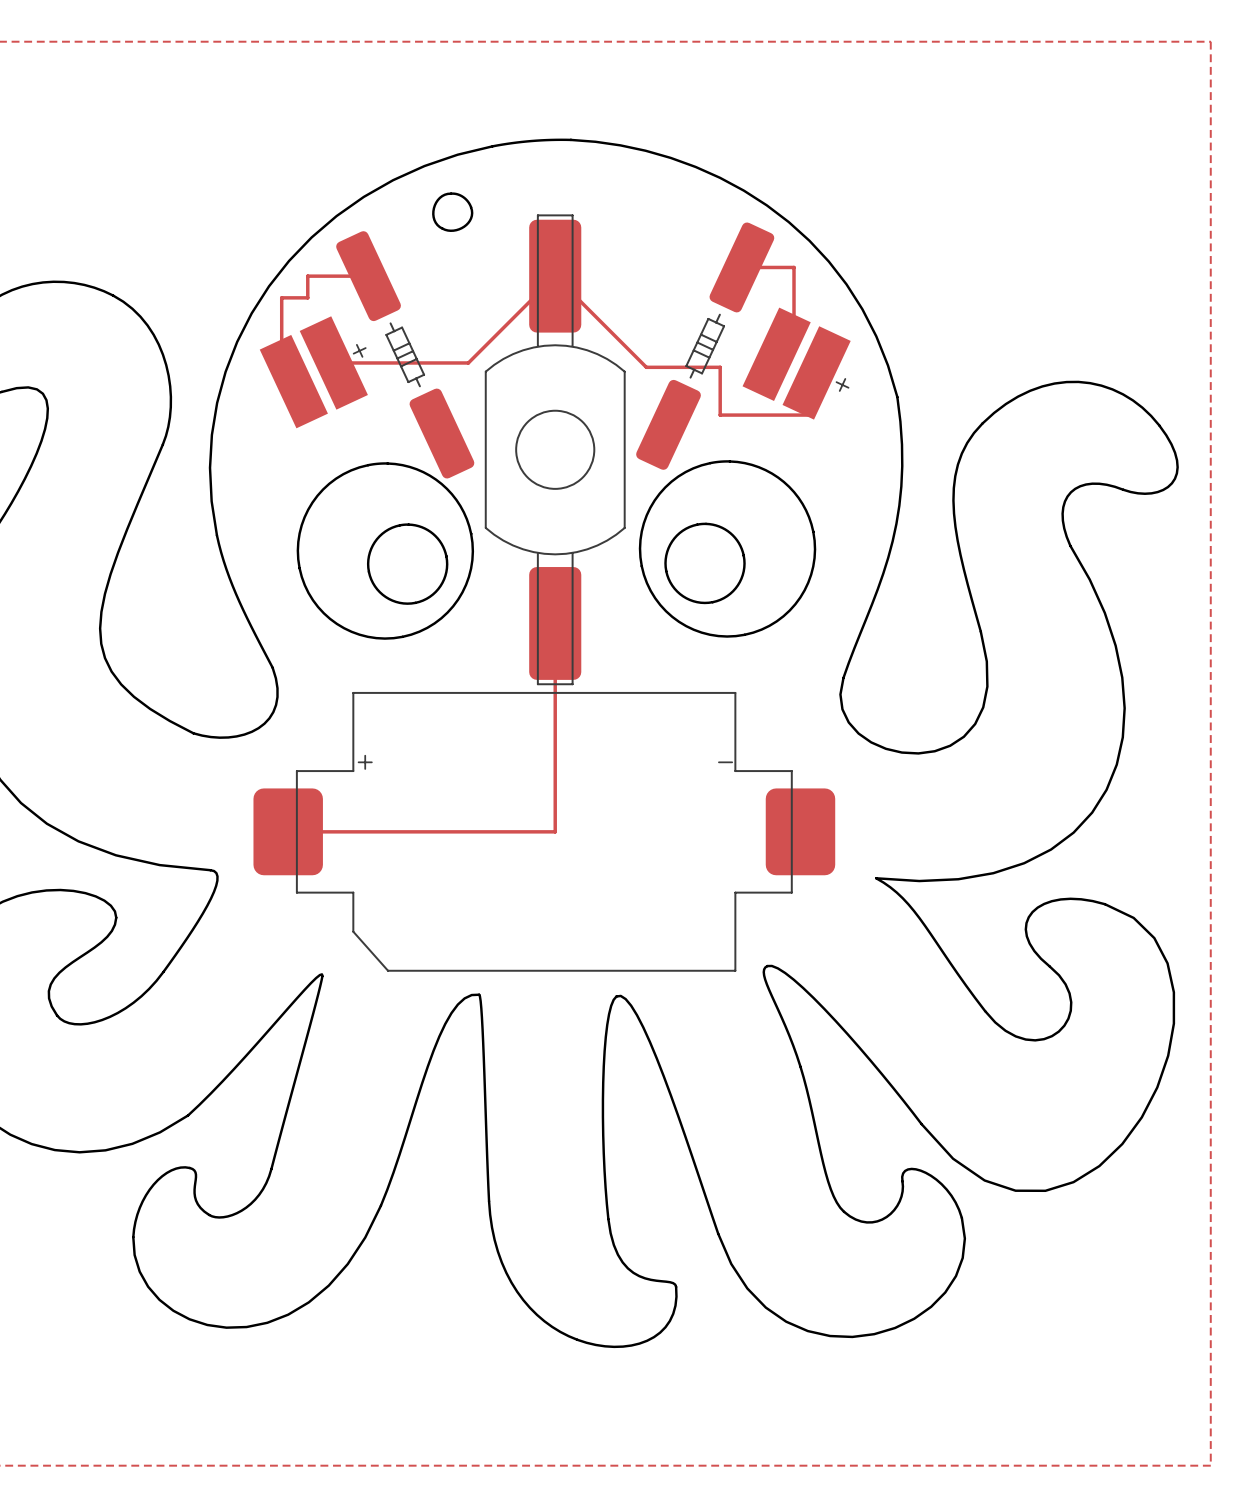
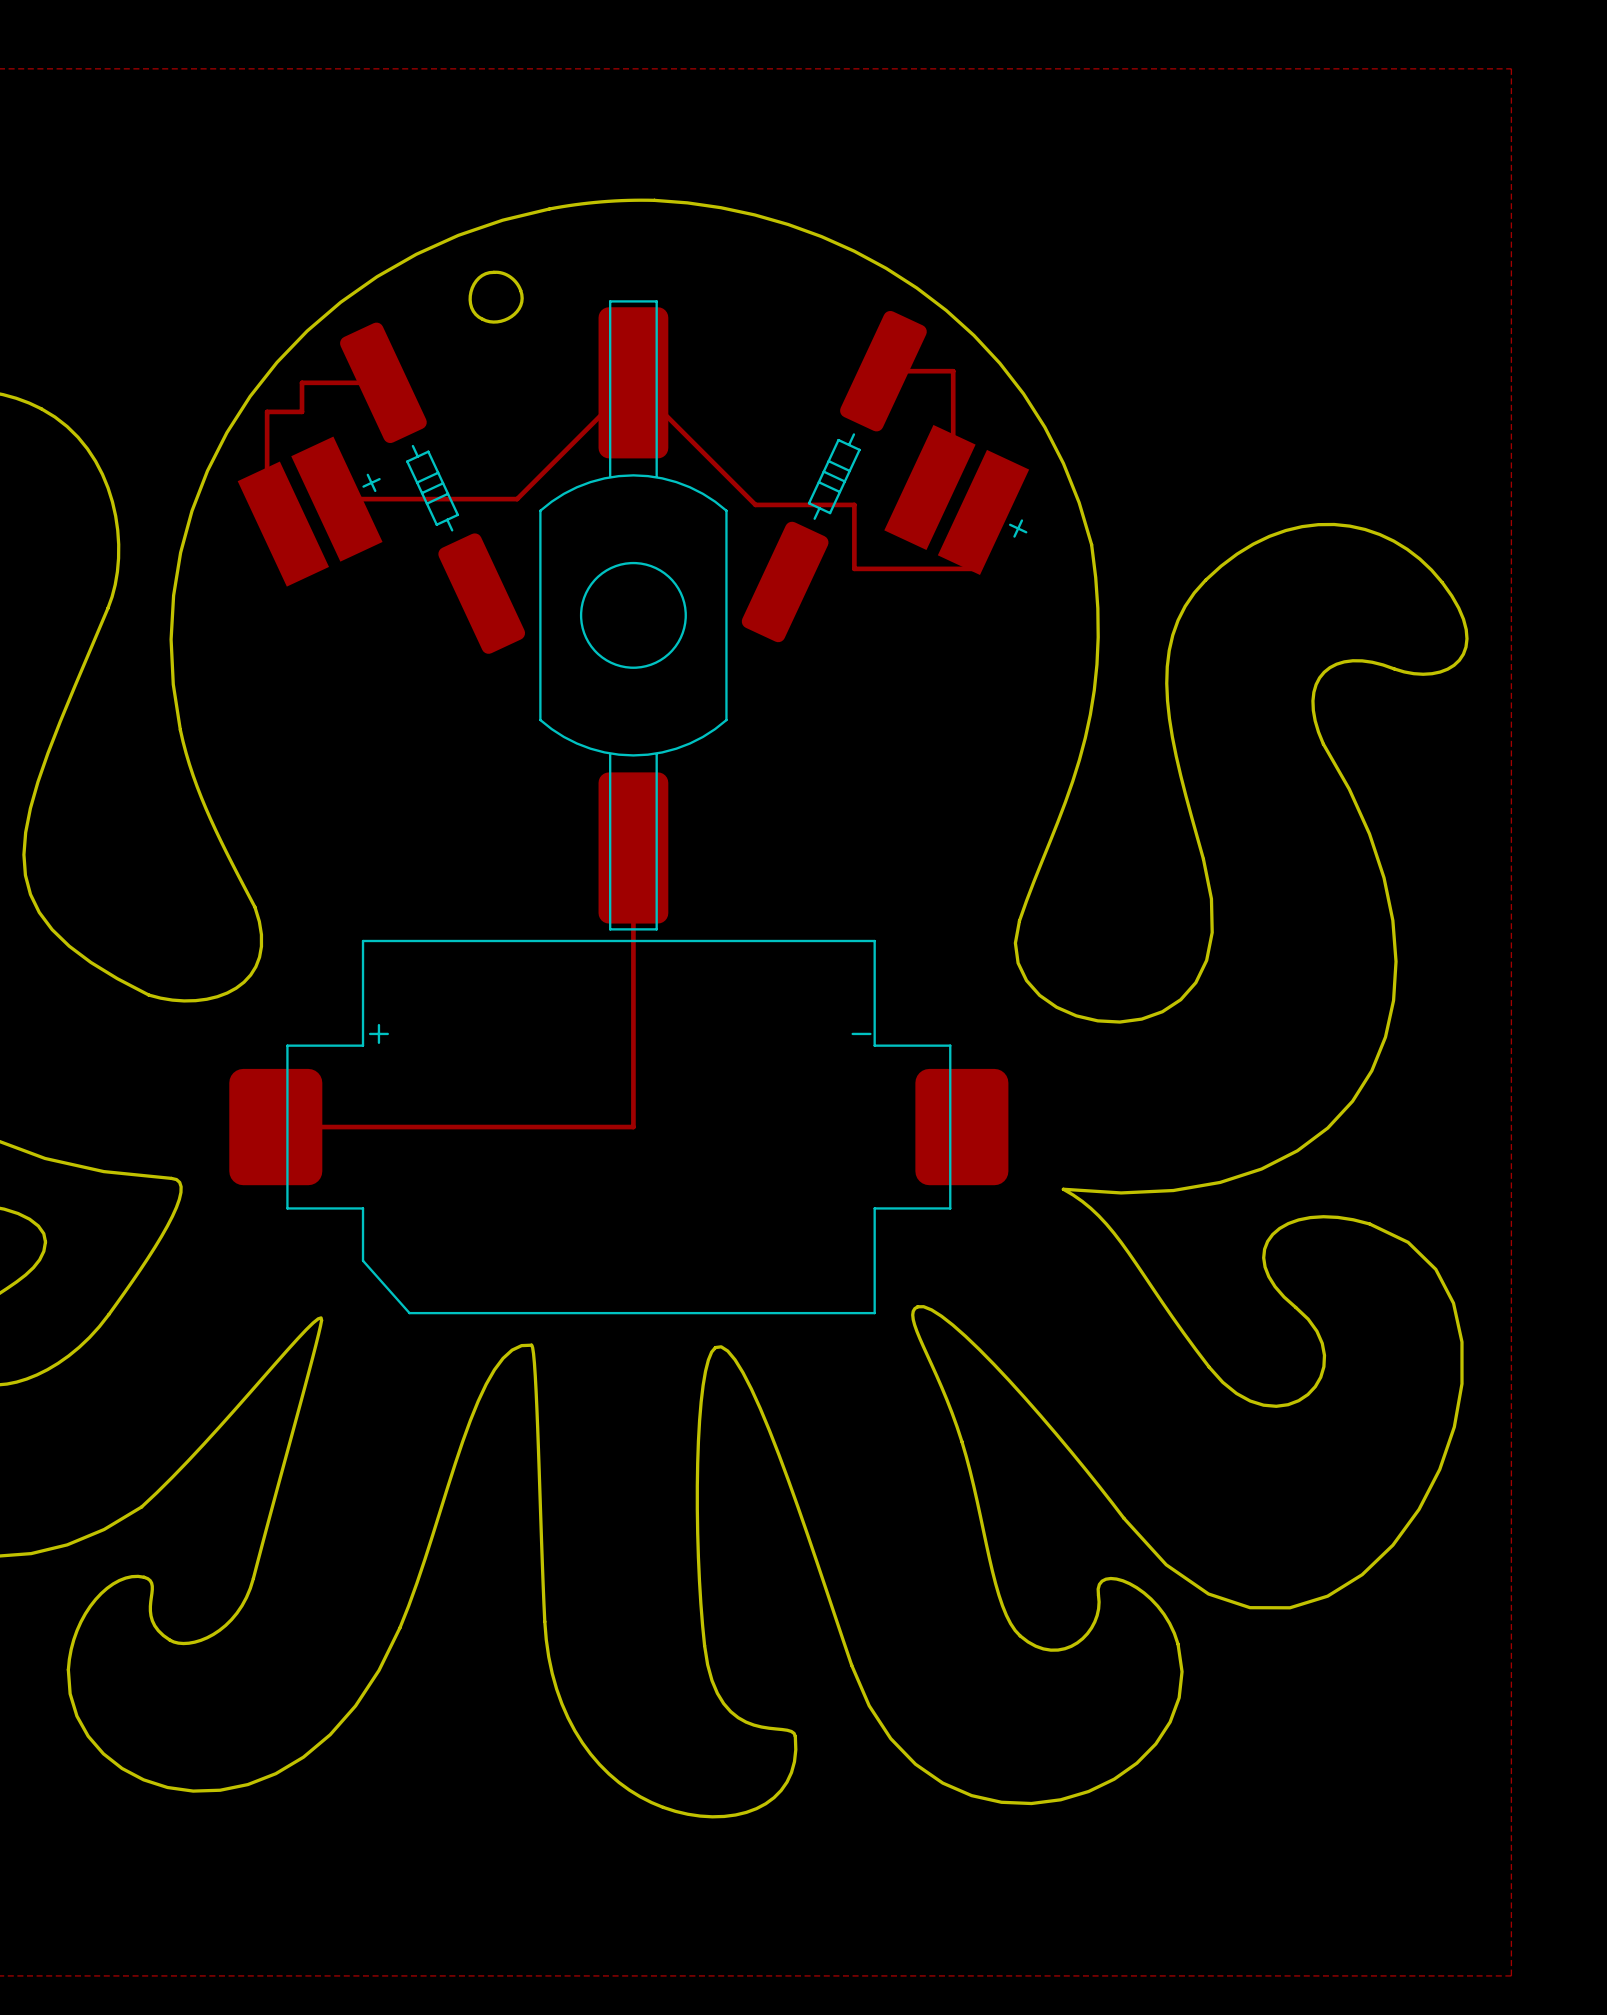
board edge: (729, 461) (711, 462) (693, 468) (678, 476) (665, 487) (654, 500) (646, 515) (641, 531) (640, 548) (641, 566) (646, 583) (655, 598) (666, 611) (679, 621) (693, 629) (709, 634) (727, 636) (744, 634) (761, 629) (776, 621) (789, 610) (800, 597) (808, 582) (813, 566) (815, 549) (813, 531) (809, 517) (802, 503) (789, 486) (772, 473) (758, 467) (729, 461) -> none
board edge: (471, 533) (460, 506) (451, 494) (435, 479) (416, 469) (402, 465) (385, 463) (368, 465) (351, 470) (336, 478) (323, 489) (312, 502) (304, 517) (299, 533) (297, 550) (299, 568) (304, 585) (313, 600) (323, 613) (336, 623) (351, 631) (367, 636) (384, 638) (402, 636) (419, 631) (434, 623) (447, 612) (458, 599) (466, 584) (471, 568) (472, 551) (471, 533) -> none
board edge: (743, 555) (738, 543) (727, 531) (712, 524) (697, 524) (682, 530) (672, 541) (666, 555) (666, 571) (672, 585) (683, 596) (697, 602) (712, 602) (727, 596) (737, 585) (743, 571) (743, 555) -> none
board edge: (446, 556) (441, 543) (430, 531) (415, 525) (399, 525) (385, 531) (374, 542) (368, 556) (368, 571) (375, 586) (385, 597) (399, 602) (415, 602) (429, 596) (440, 586) (446, 572) (446, 556) -> none

